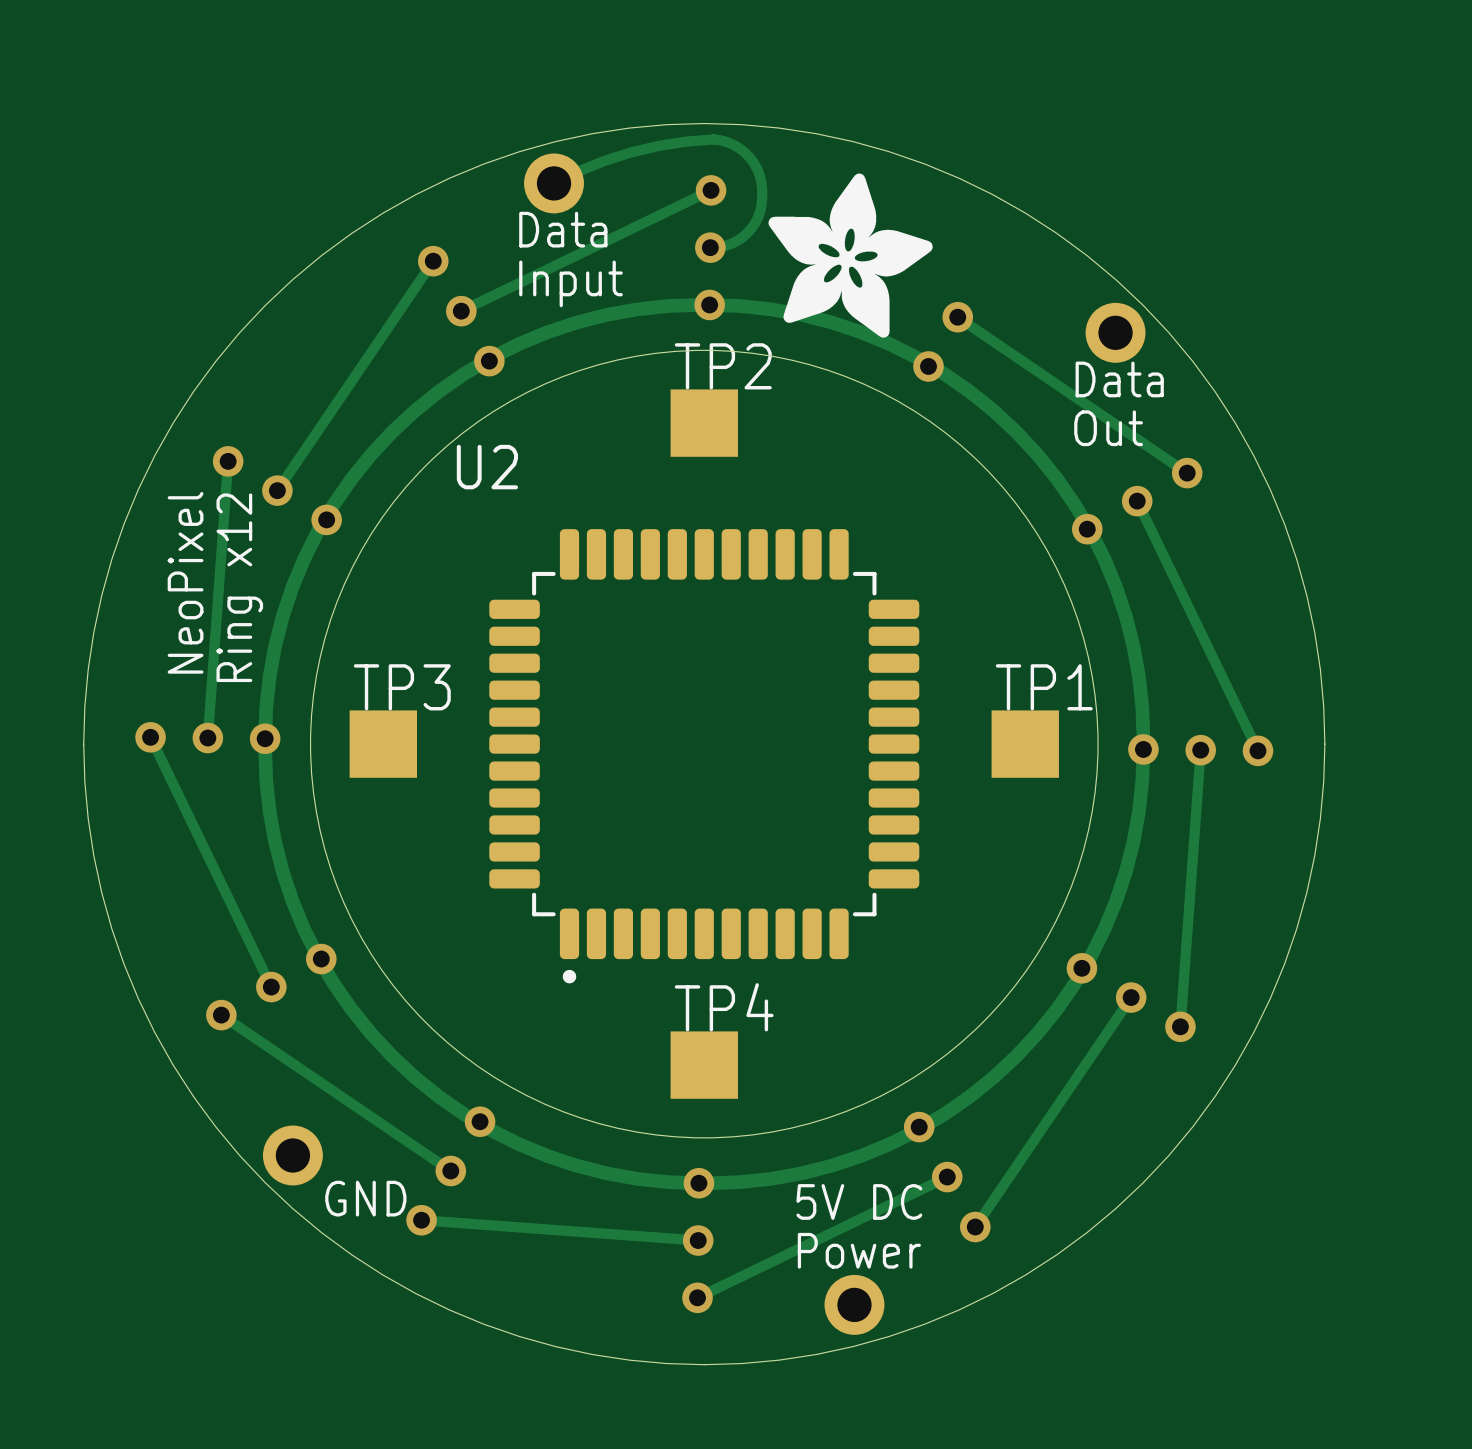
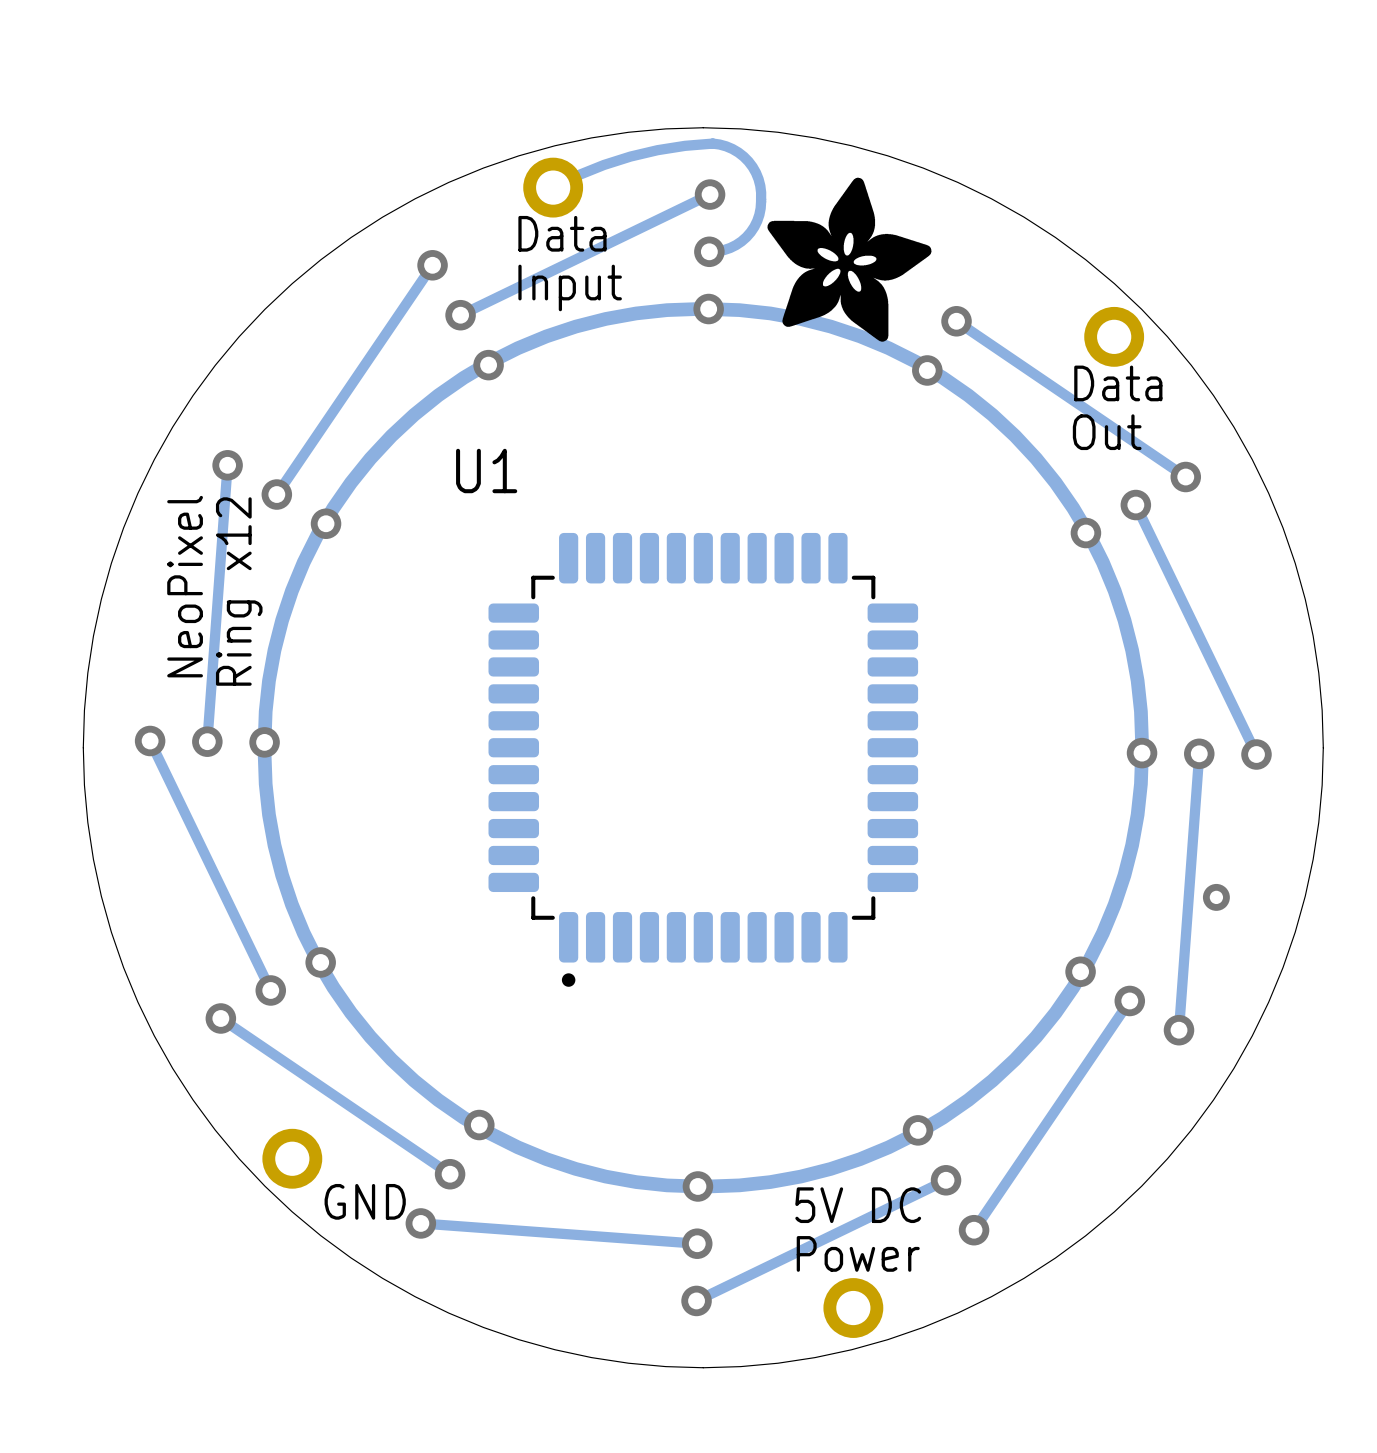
round board edge: [310, 350, 1099, 1138] -> none
TP2: (704, 423) -> none
U2 name: U2 (487, 467) -> U1 (486, 471)
TP3: (383, 744) -> none
TP1: (1025, 744) -> none
via: none -> (1216, 897)
TP4: (704, 1065) -> none

